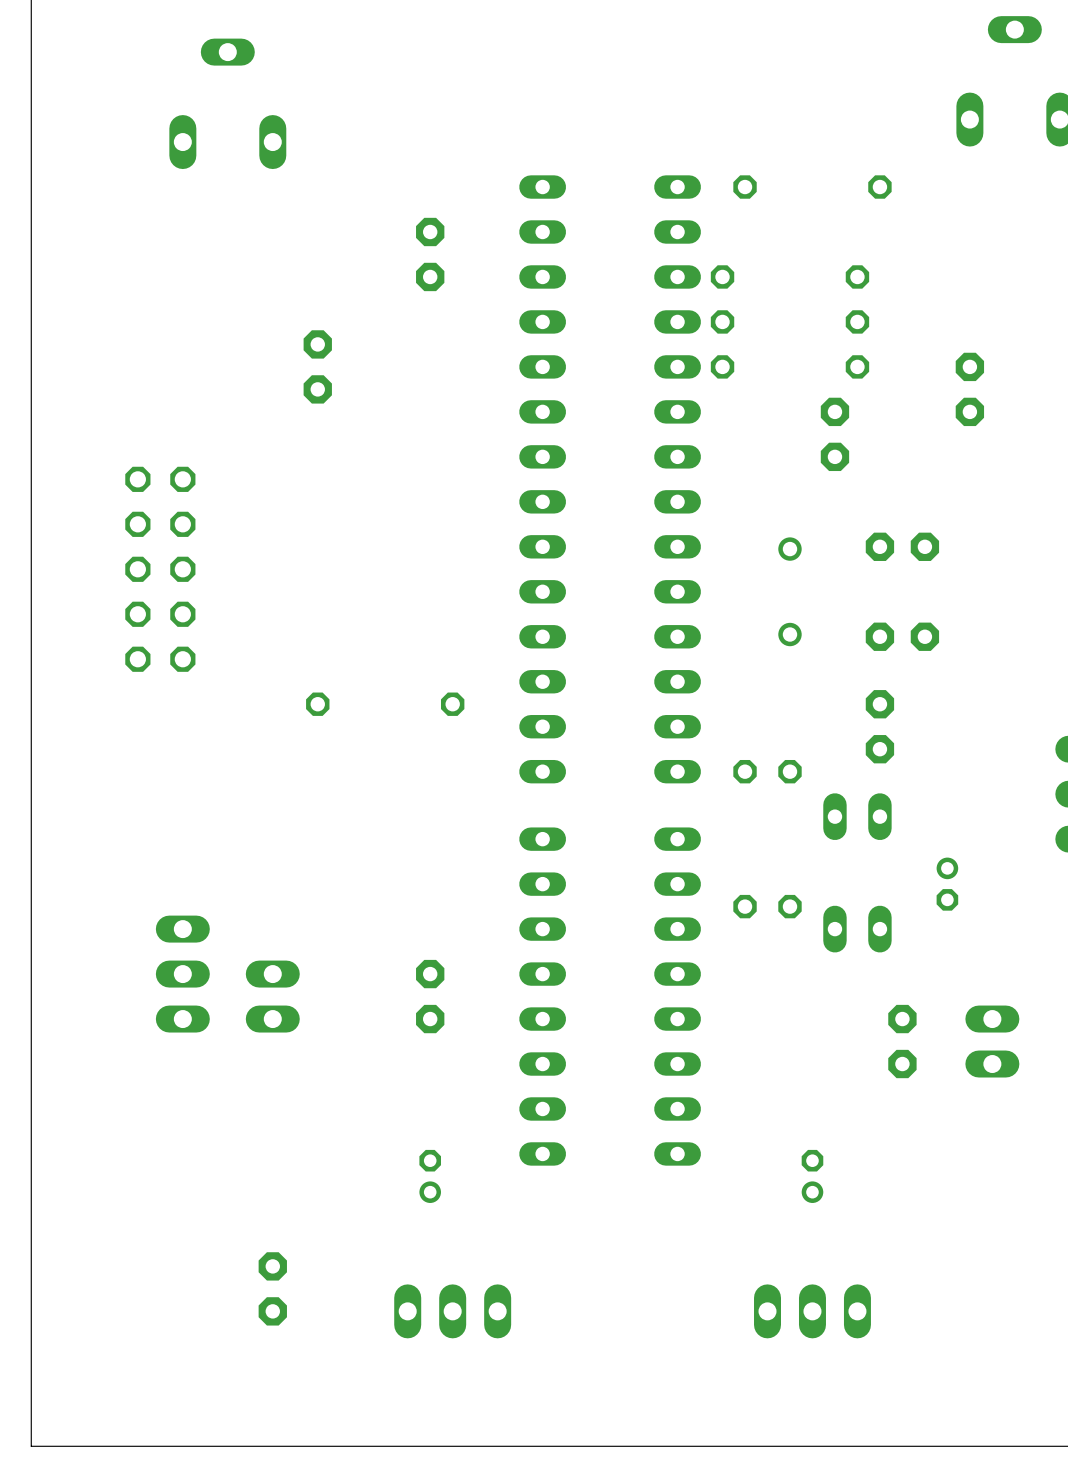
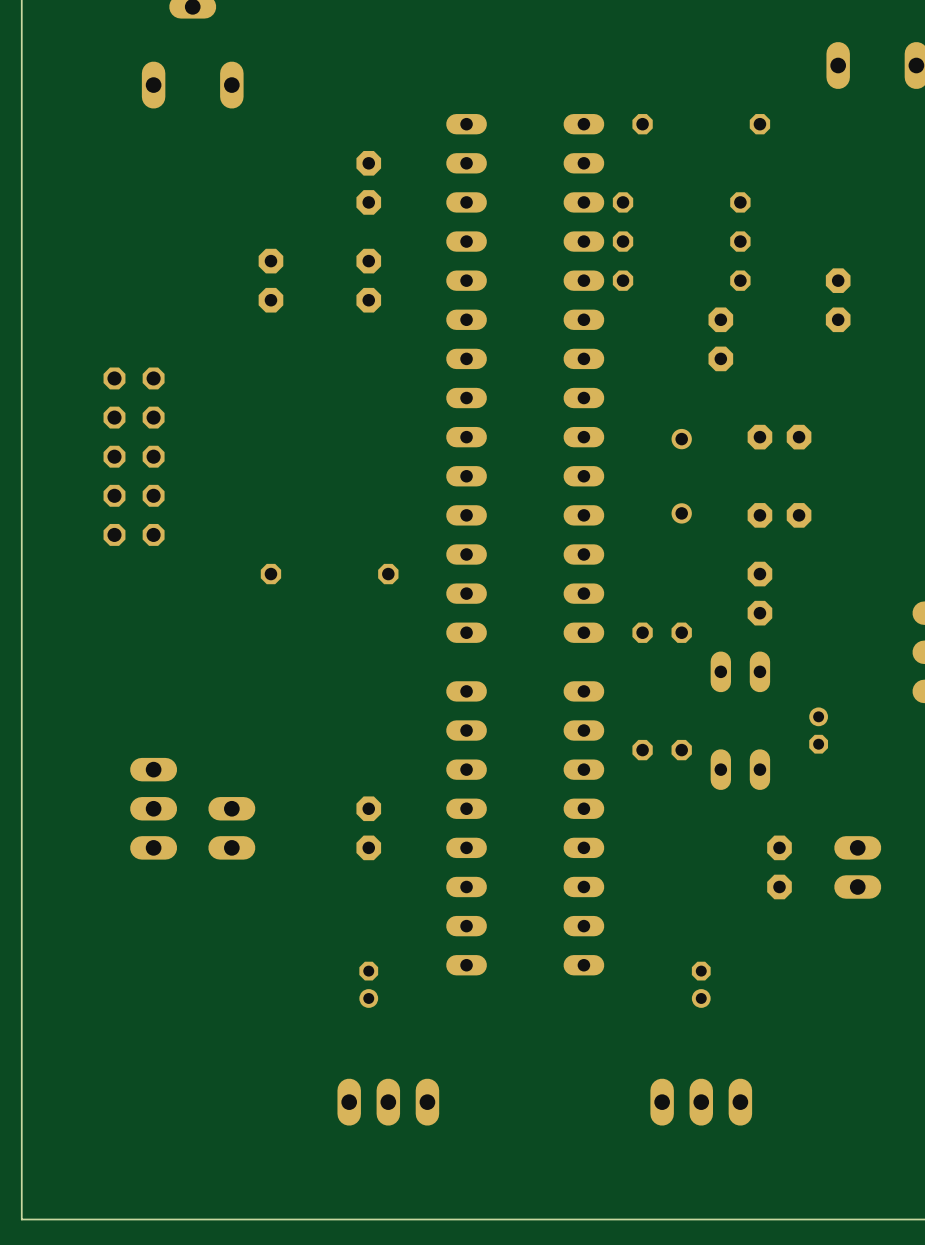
part: none -> (368, 280)
part: (272, 1288) -> none

